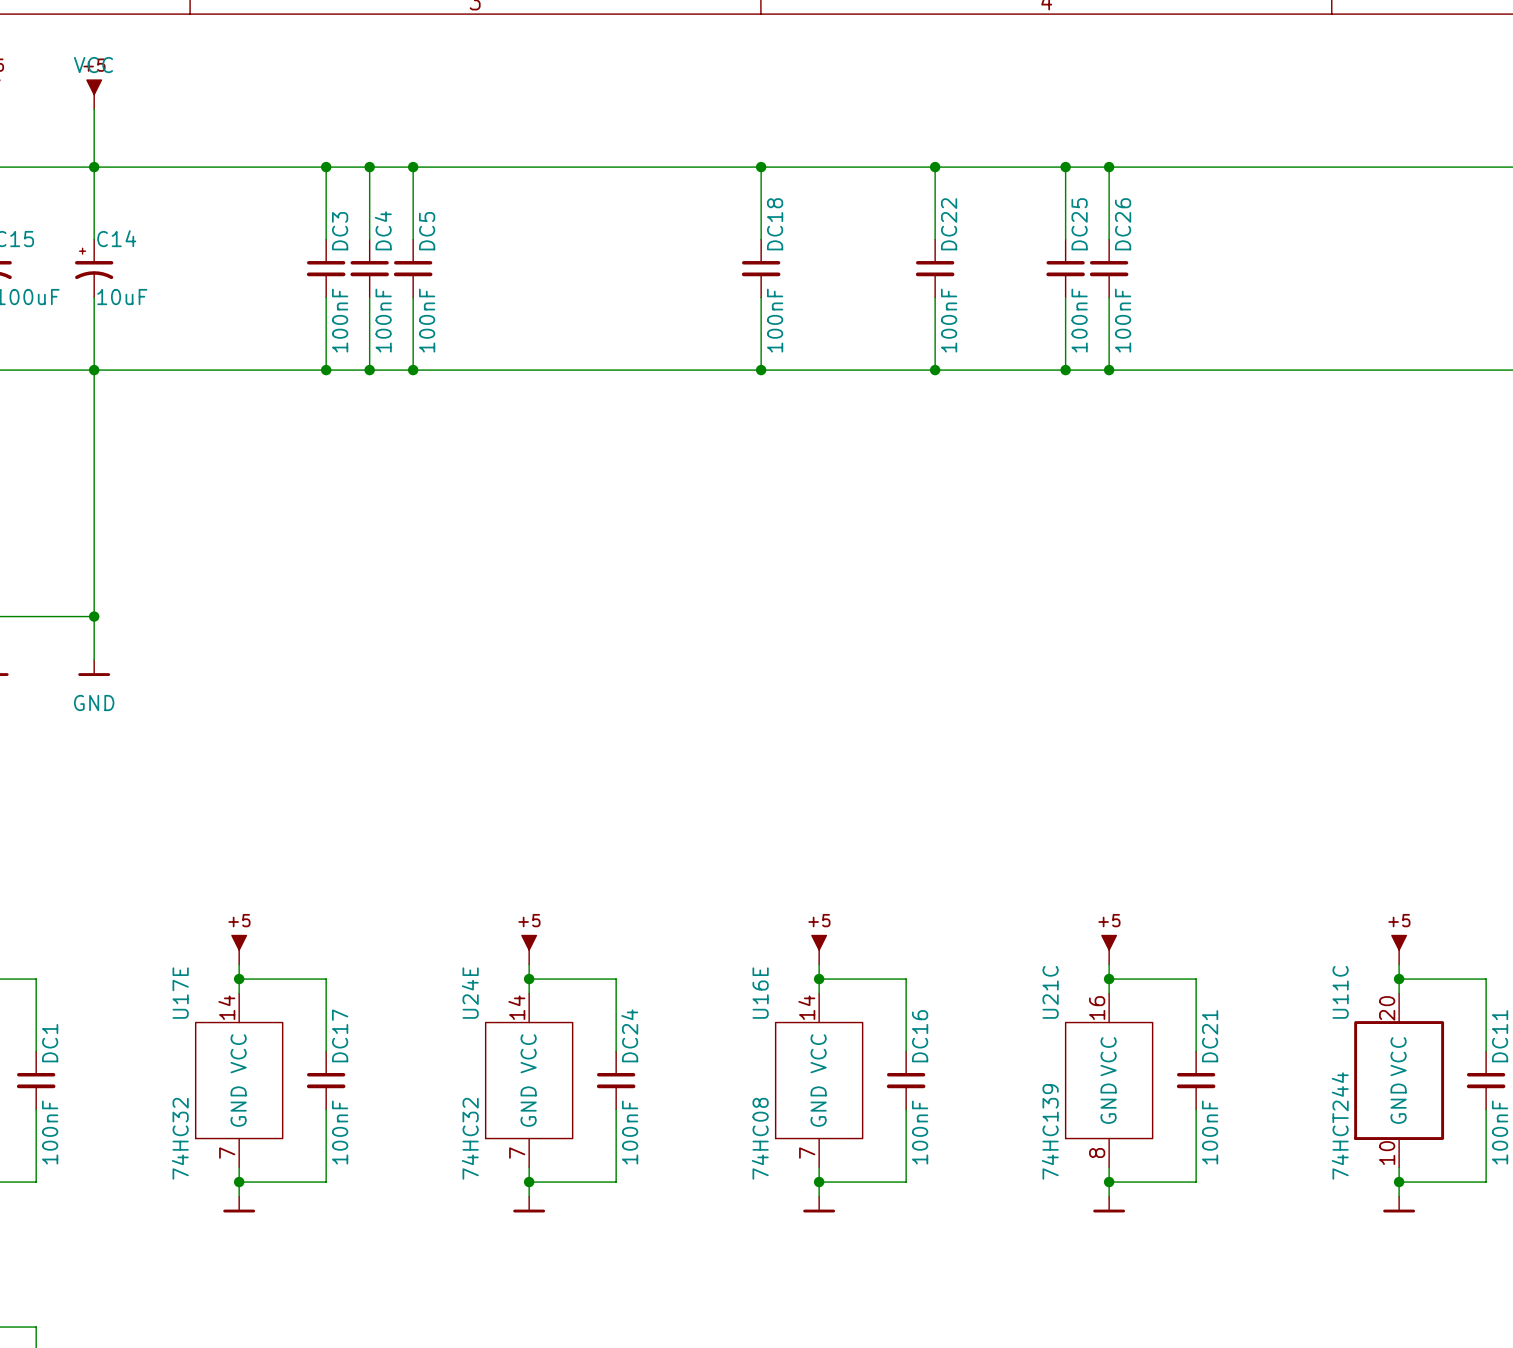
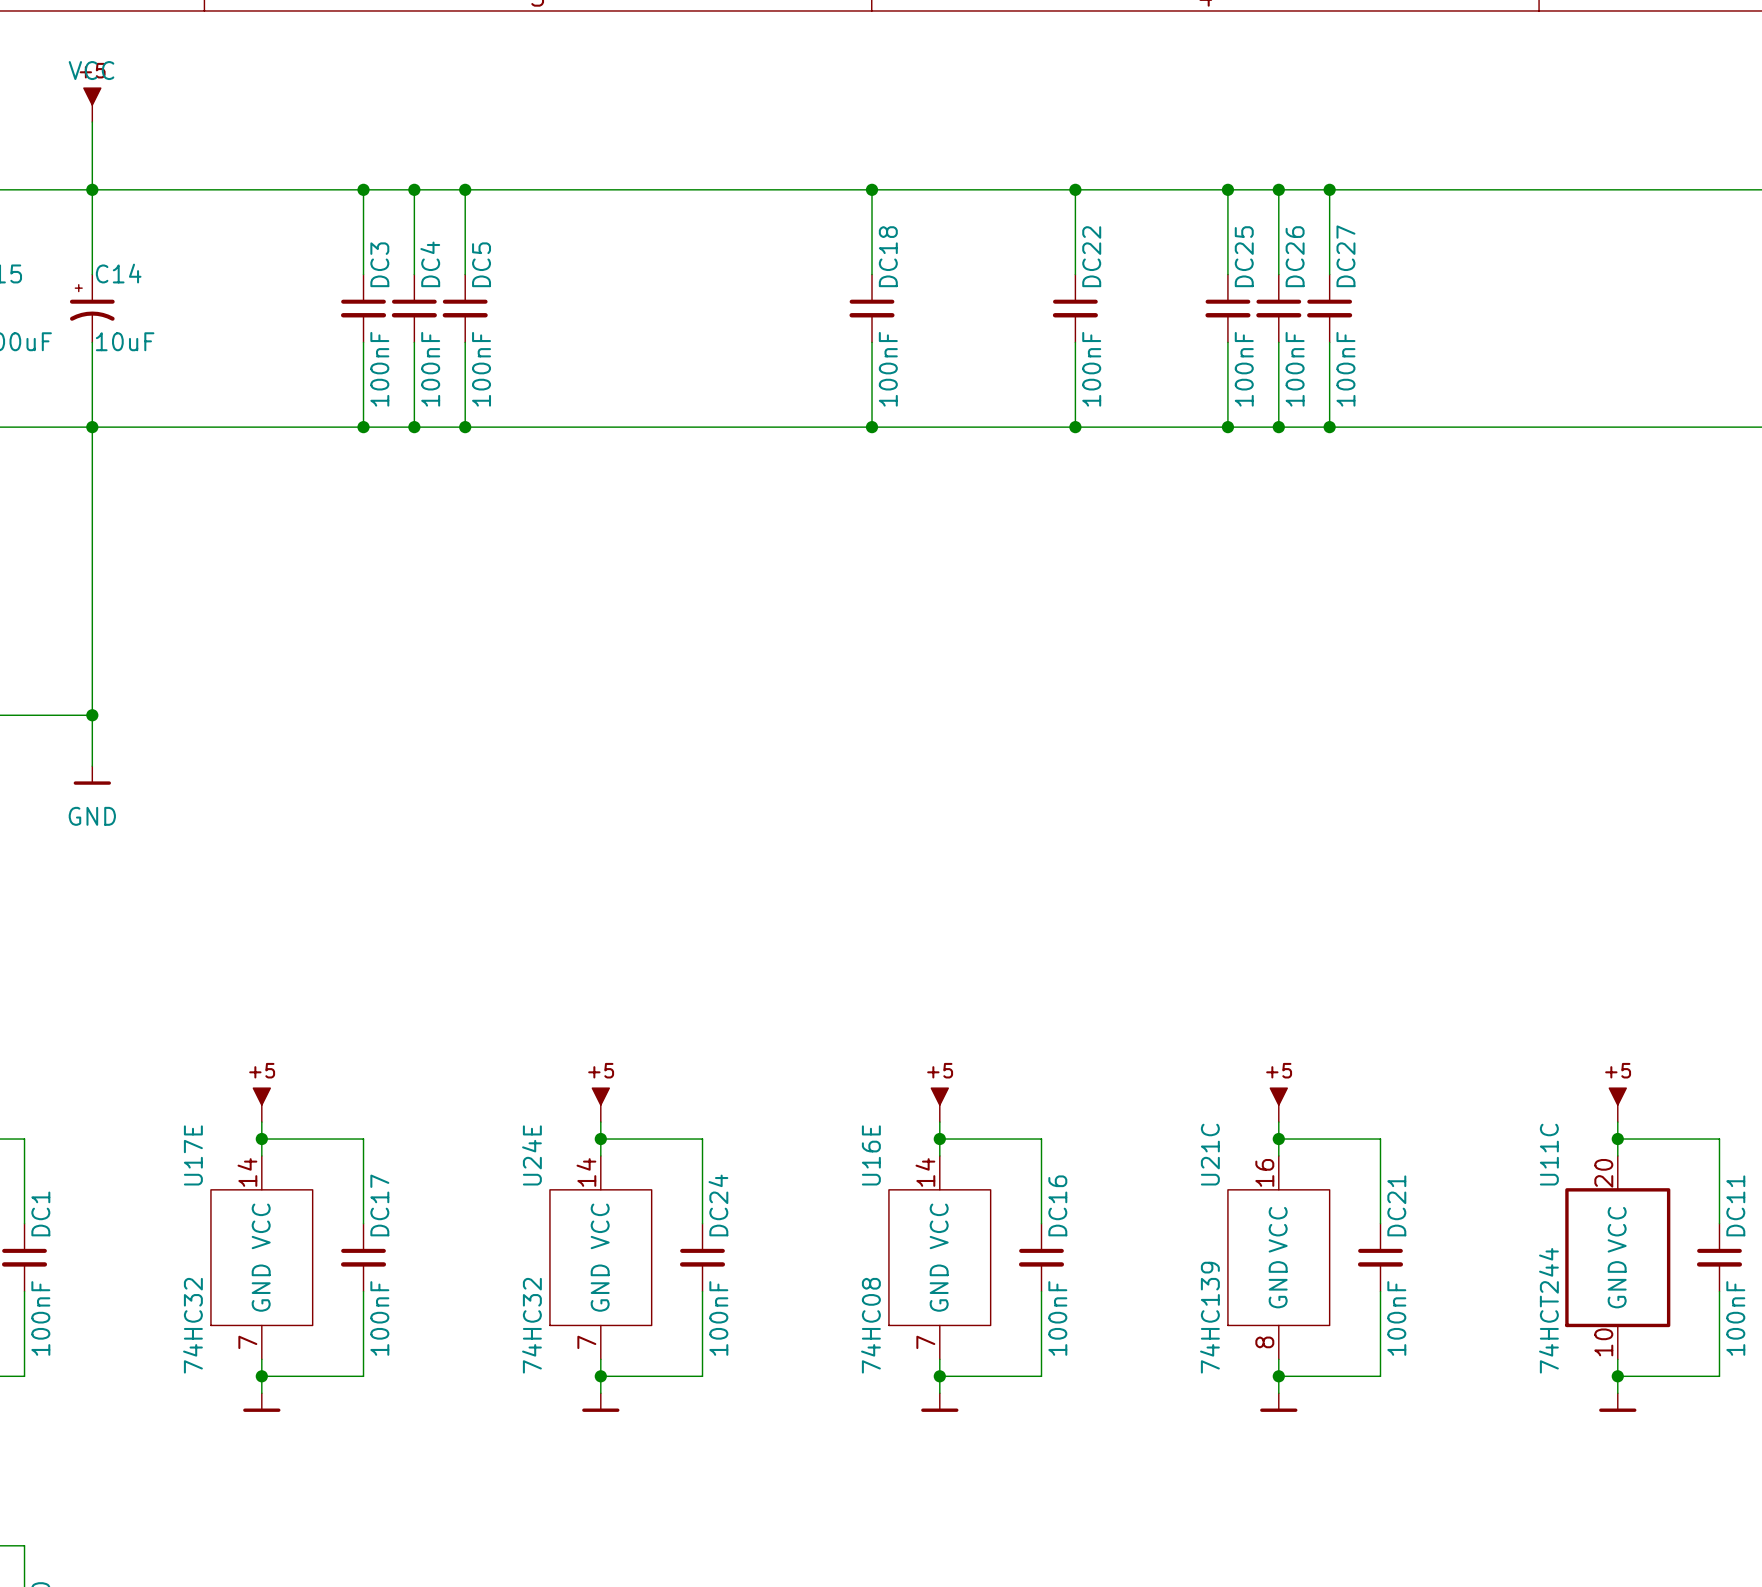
wire: none -> (1329, 189) (1329, 274)
junction: none -> (1329, 189)
DC27: none -> 100nF (1329, 308)
wire: none -> (1329, 342) (1329, 427)
junction: none -> (1329, 427)

